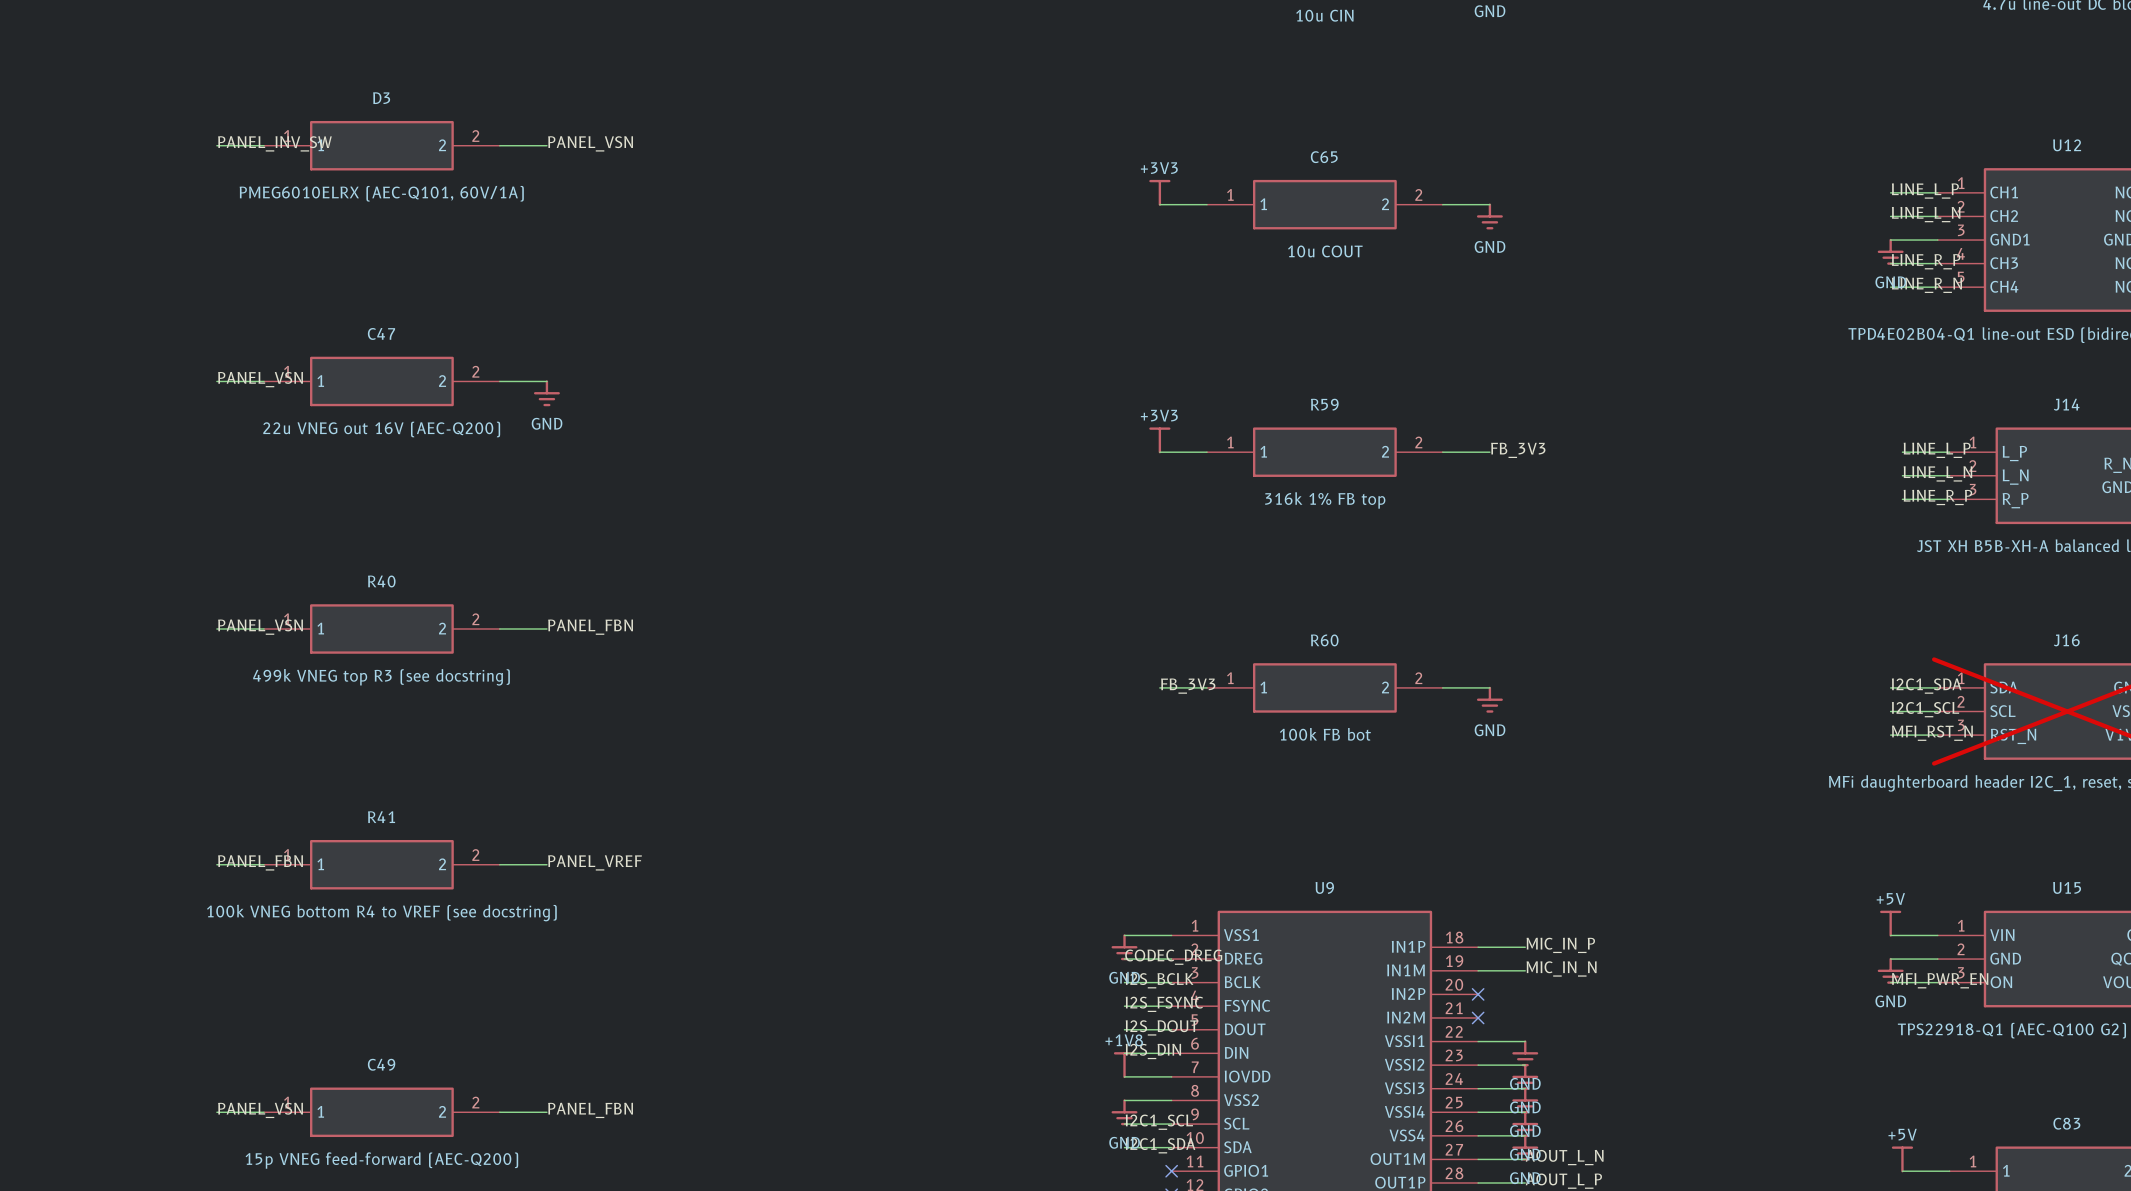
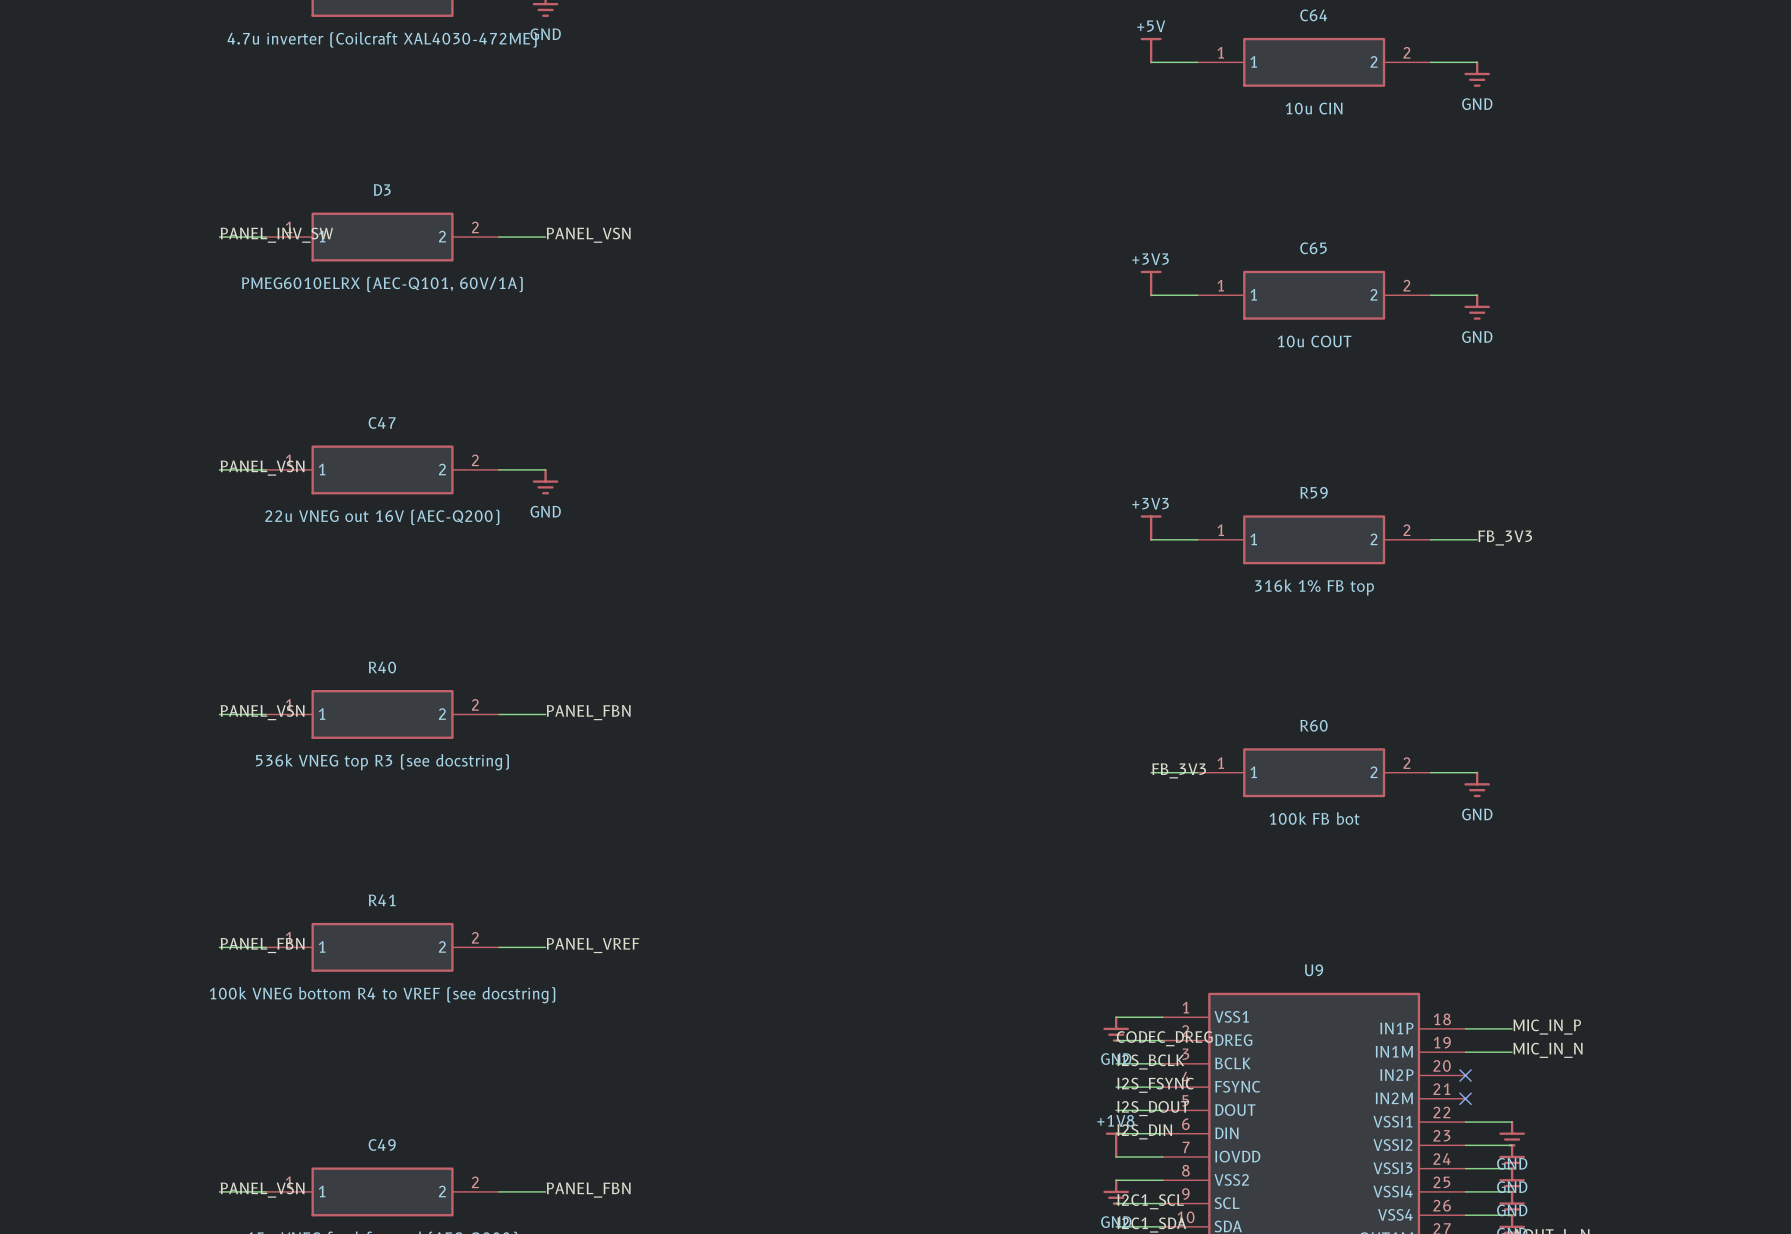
R40 value: 499k VNEG top R3 (see docstring) (381, 677) -> 536k VNEG top R3 (see docstring) (382, 762)

